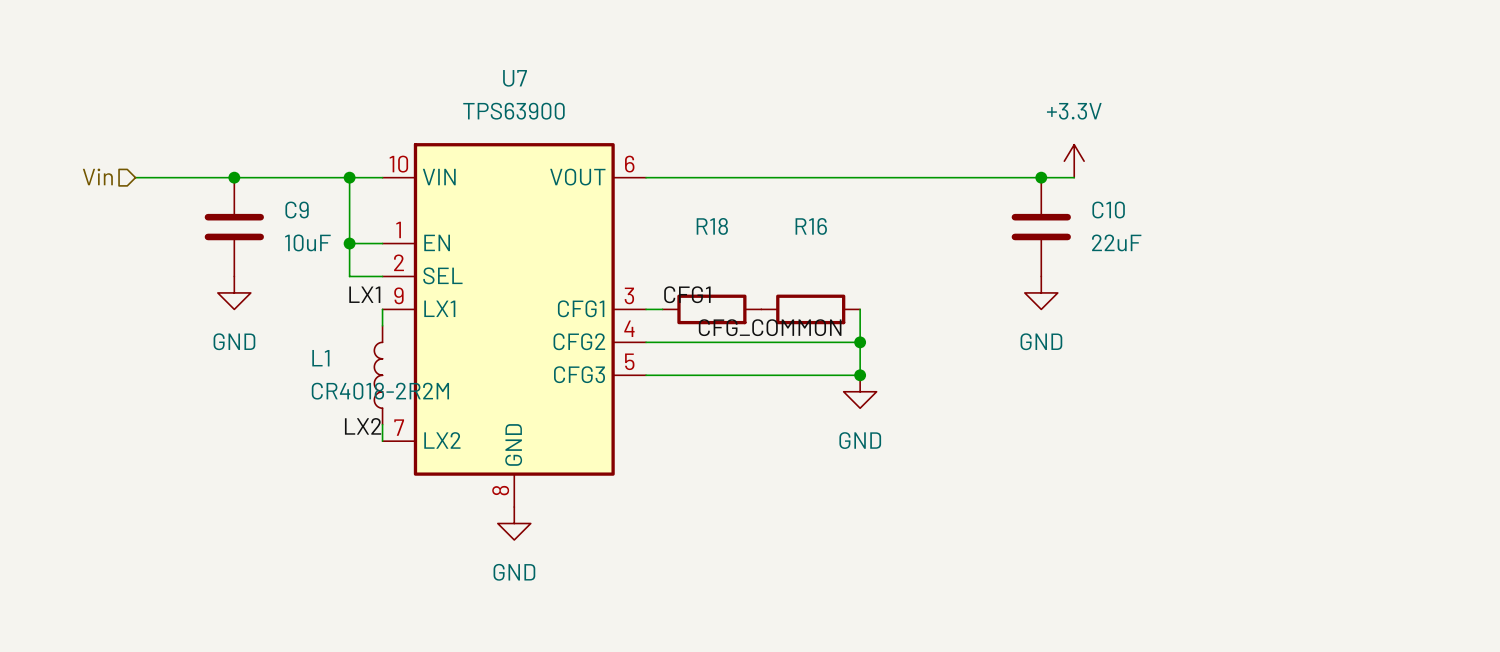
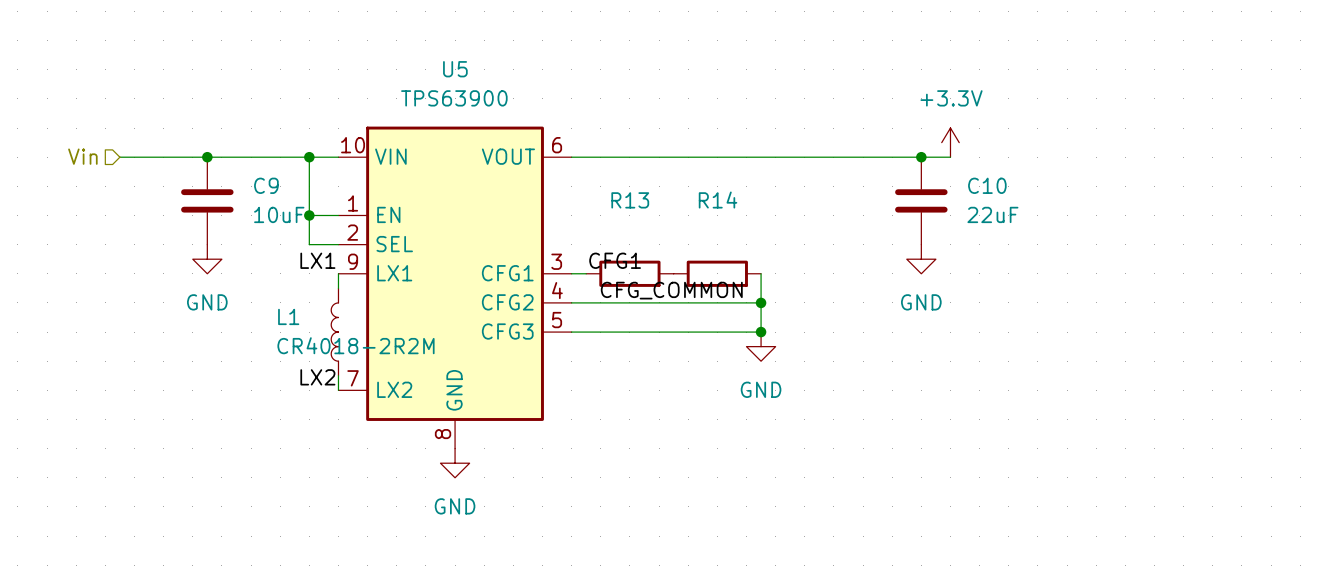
U7 name: U7 (515, 78) -> U5 (455, 69)
R18 name: R18 (712, 226) -> R13 (630, 200)
R16 name: R16 (811, 226) -> R14 (718, 200)

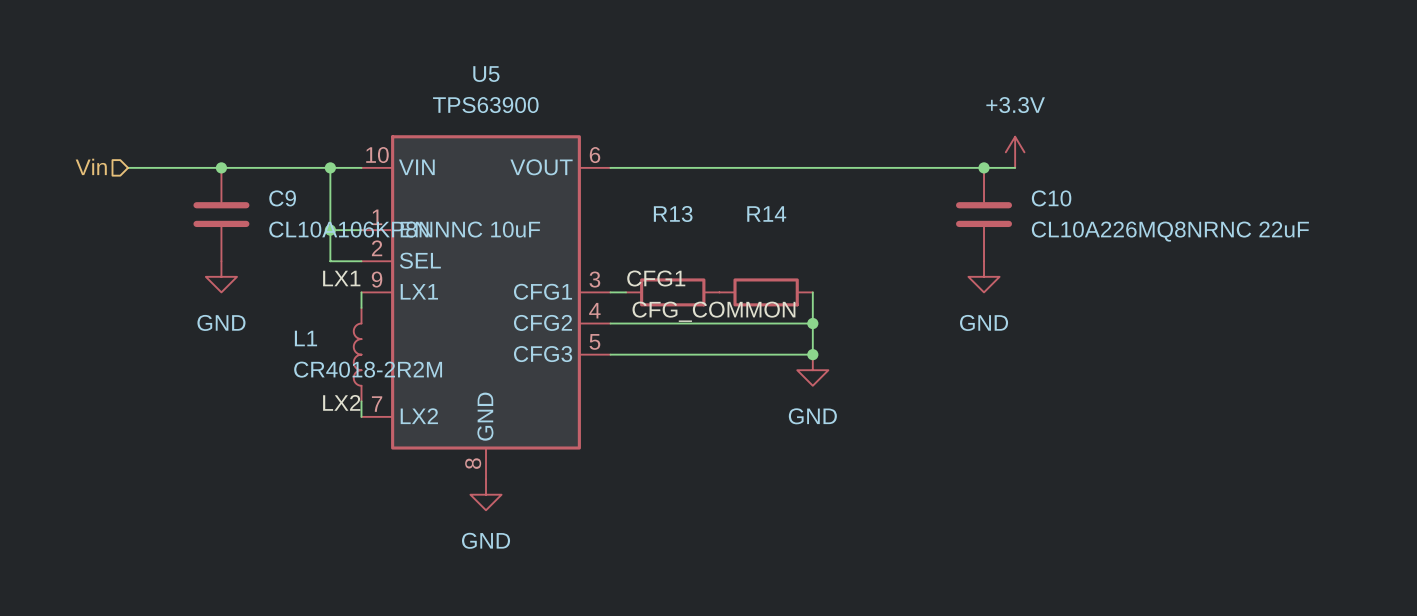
C9 value: 10uF (279, 214) -> CL10A106KP8NNNC 10uF (404, 229)
C10 value: 22uF (992, 214) -> CL10A226MQ8NRNC 22uF (1170, 231)

